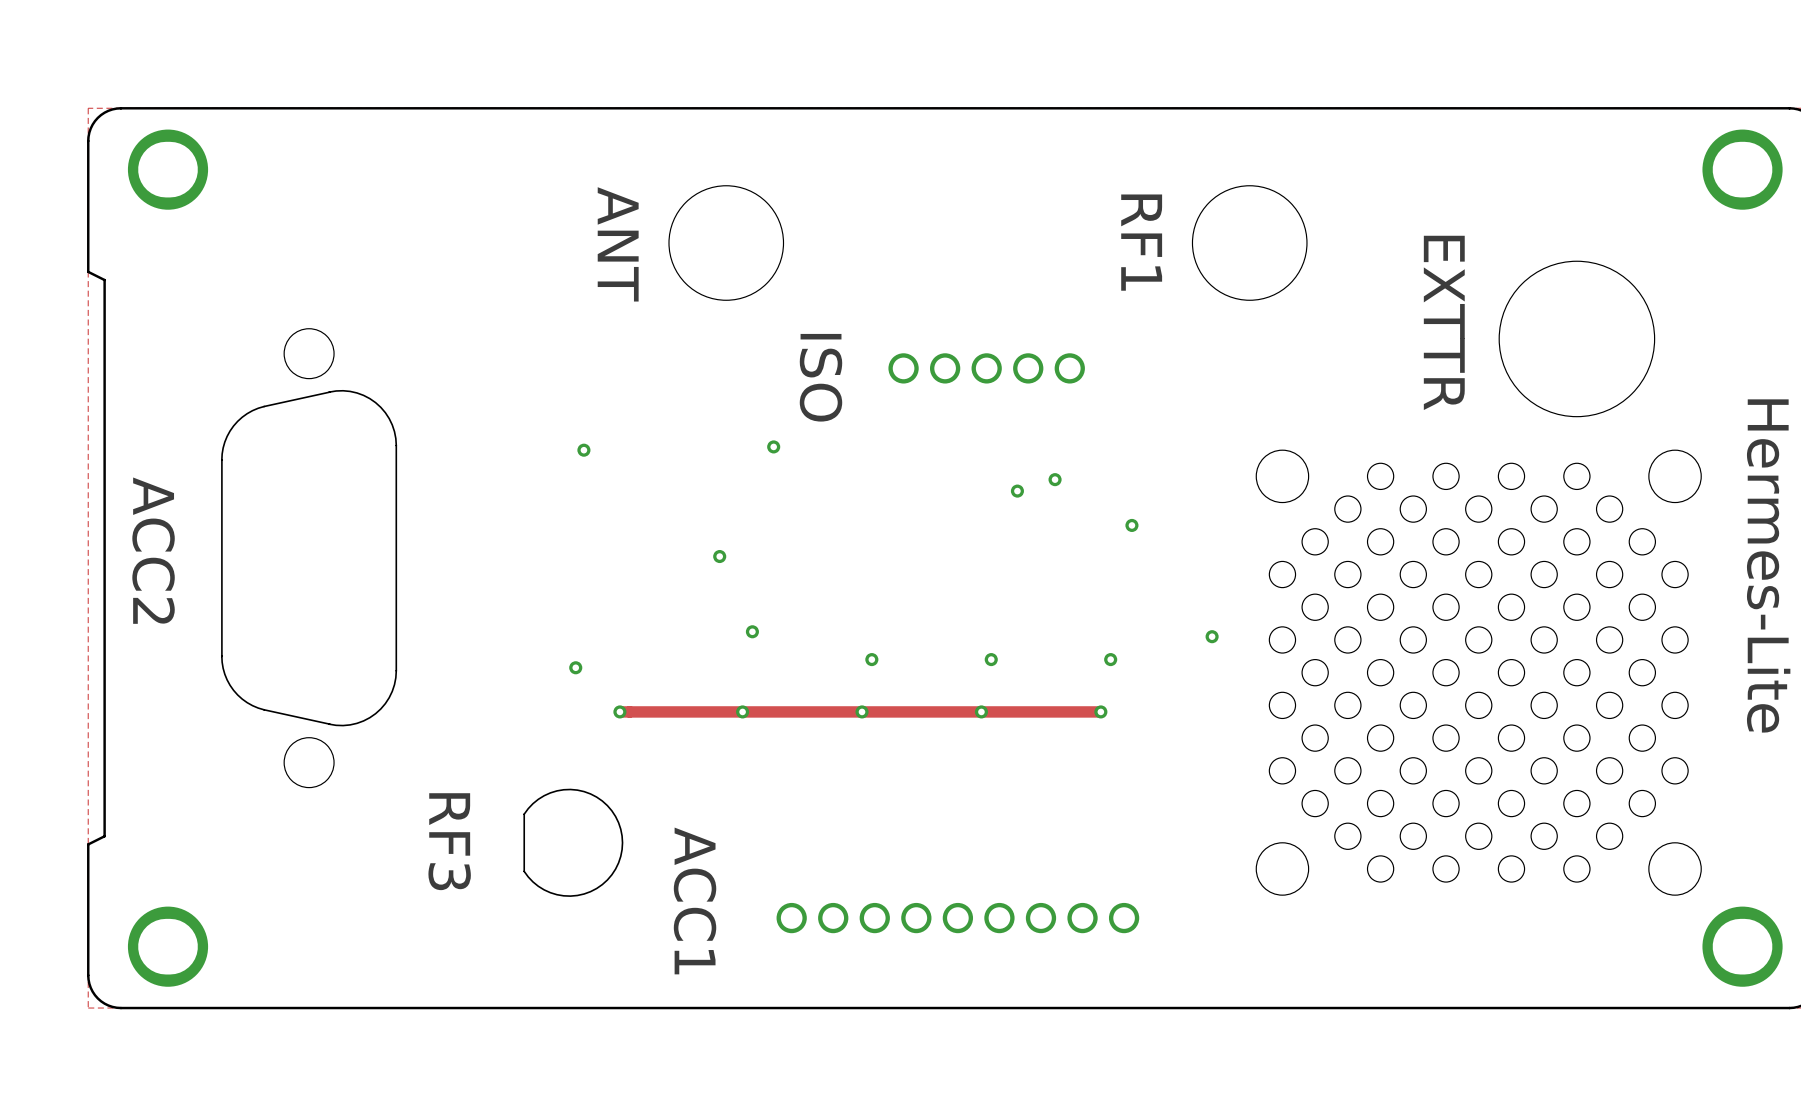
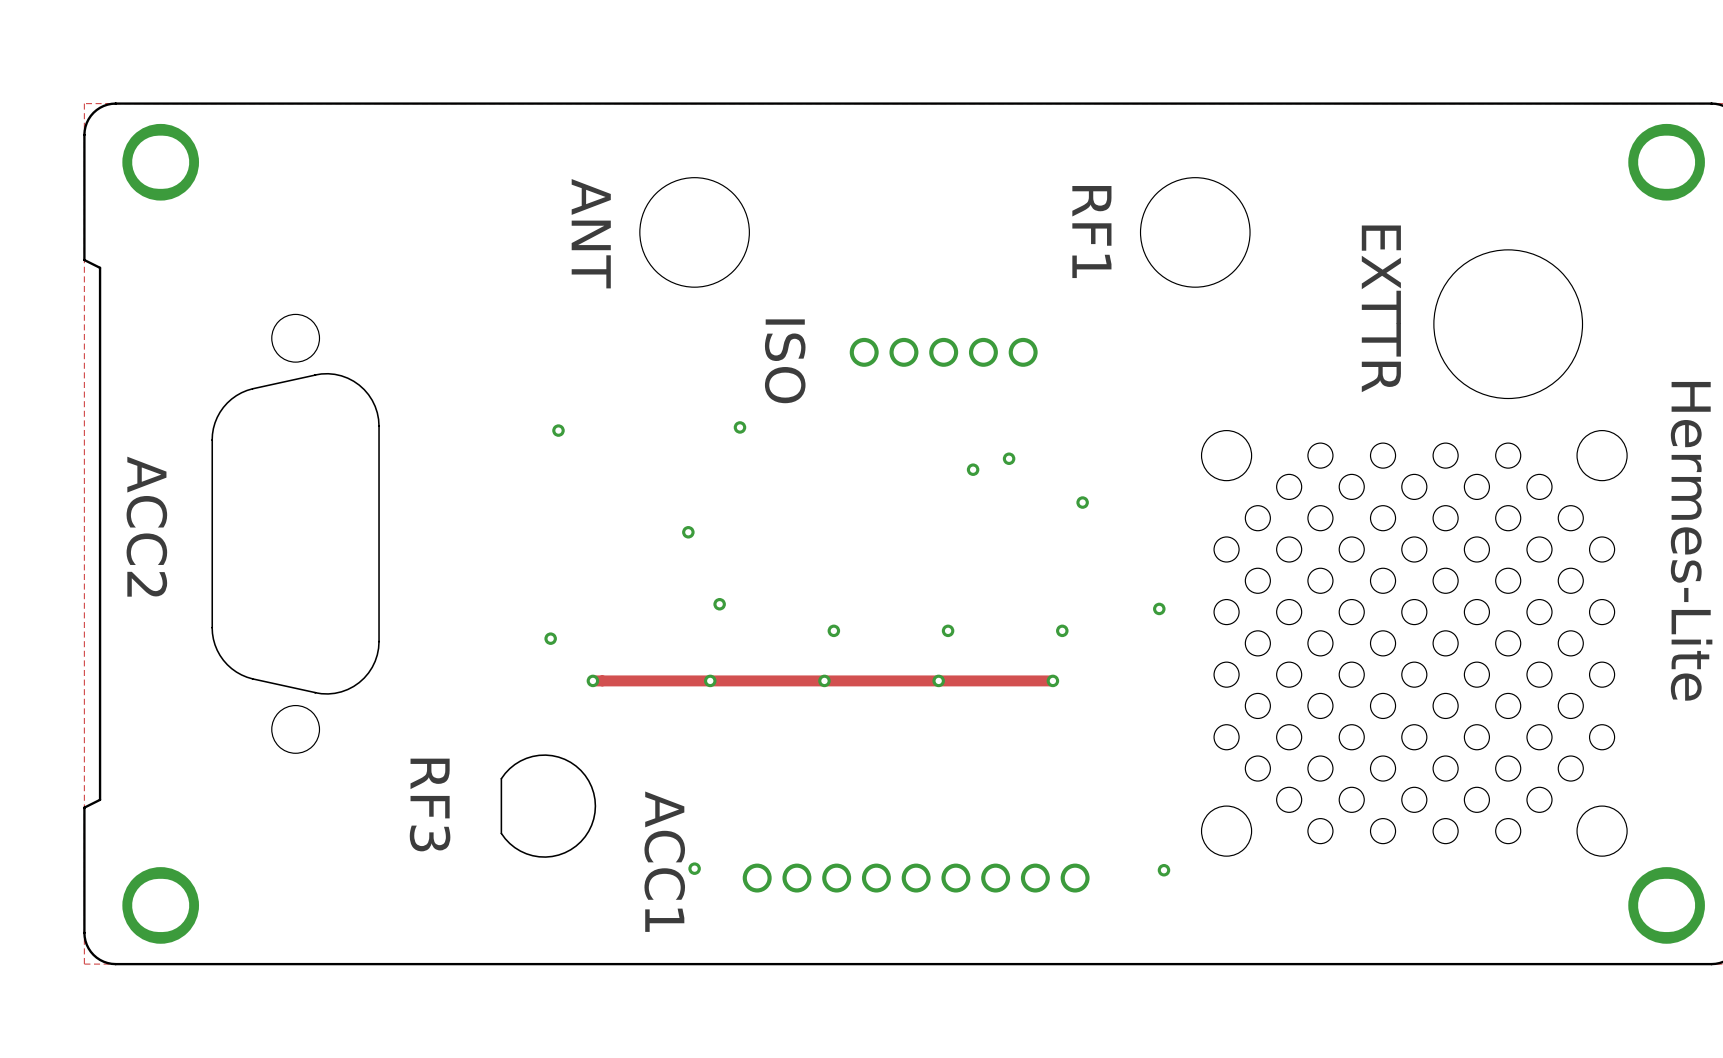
via: none -> (694, 868)
via: none -> (1163, 870)

